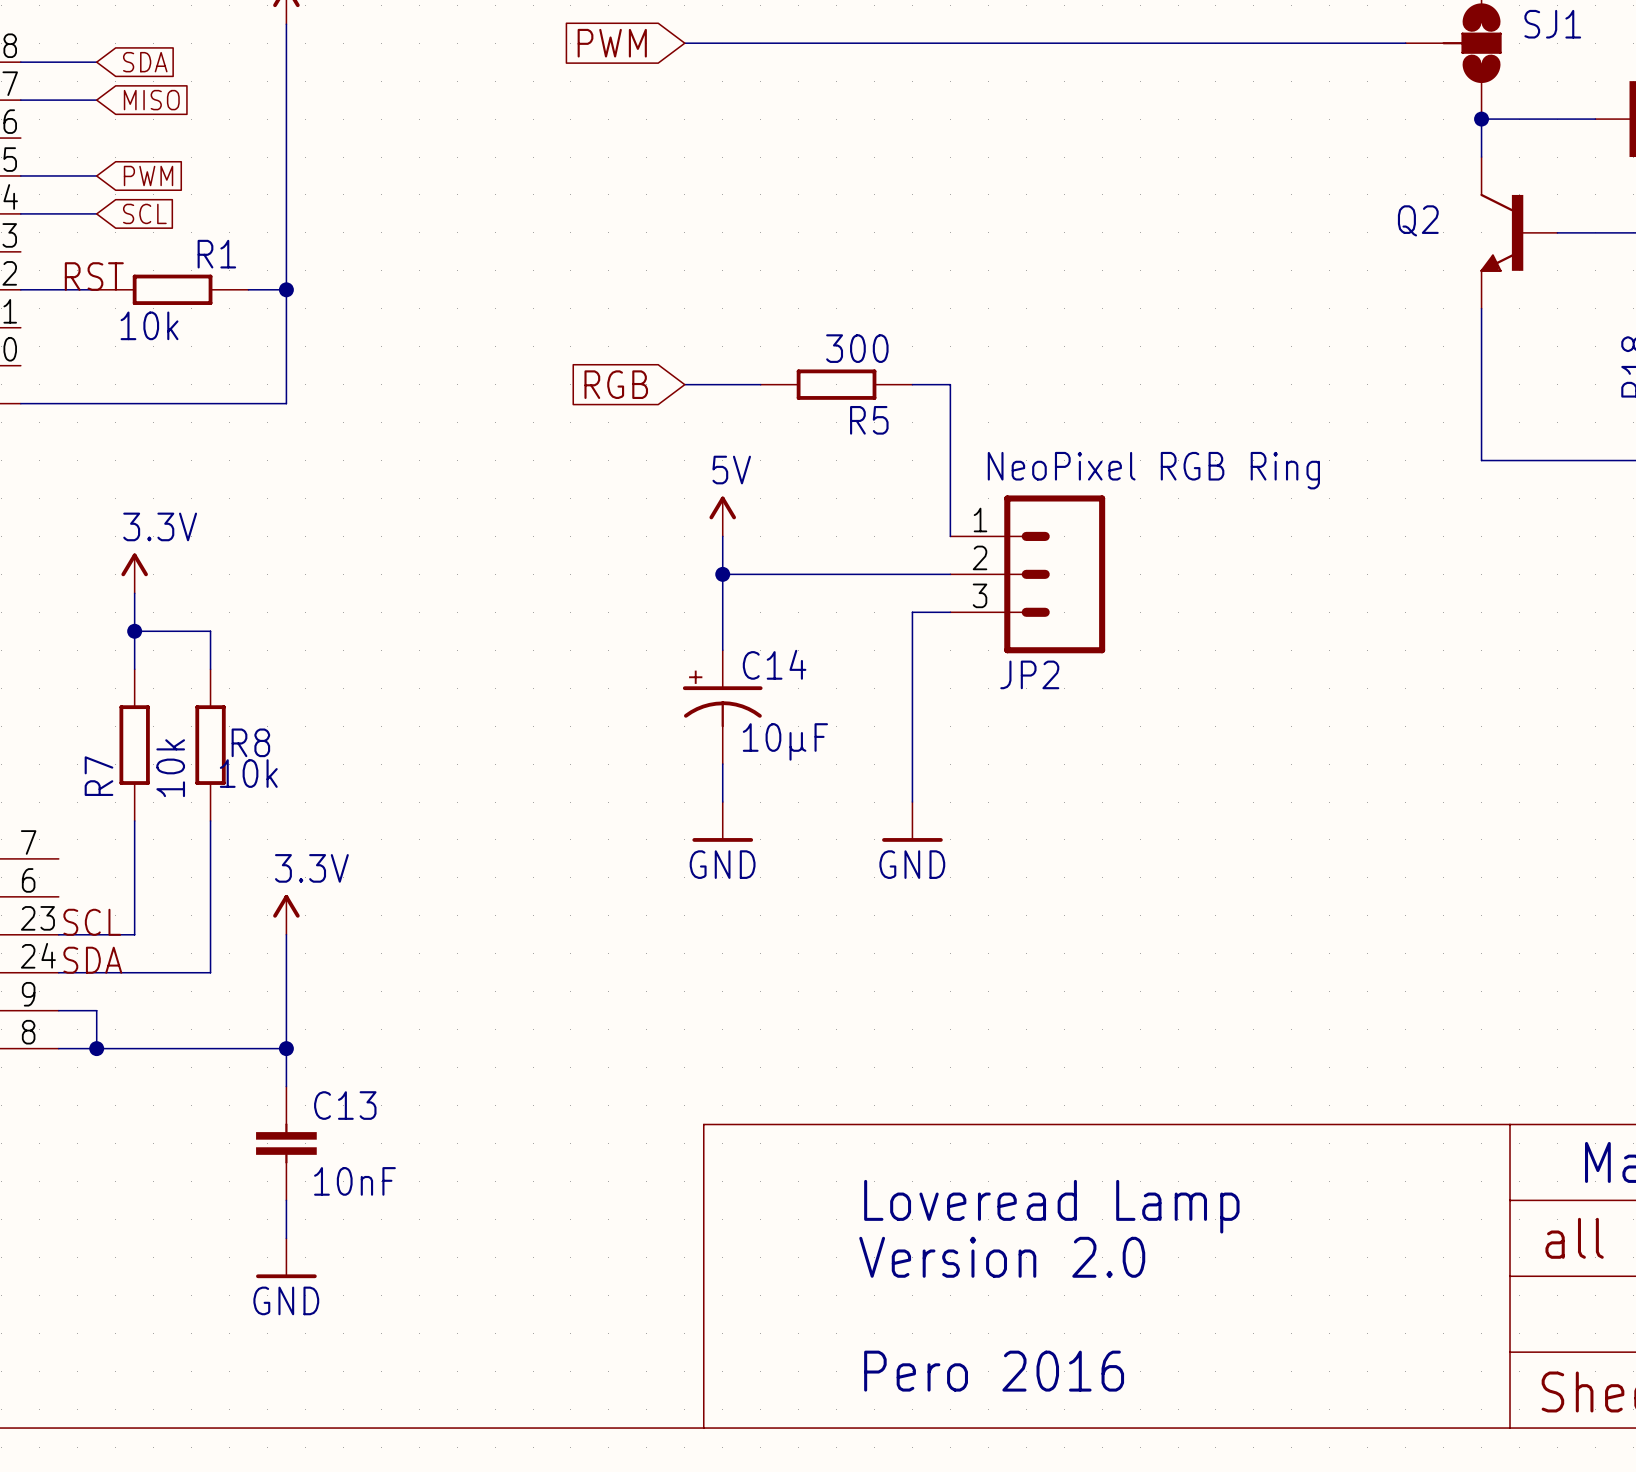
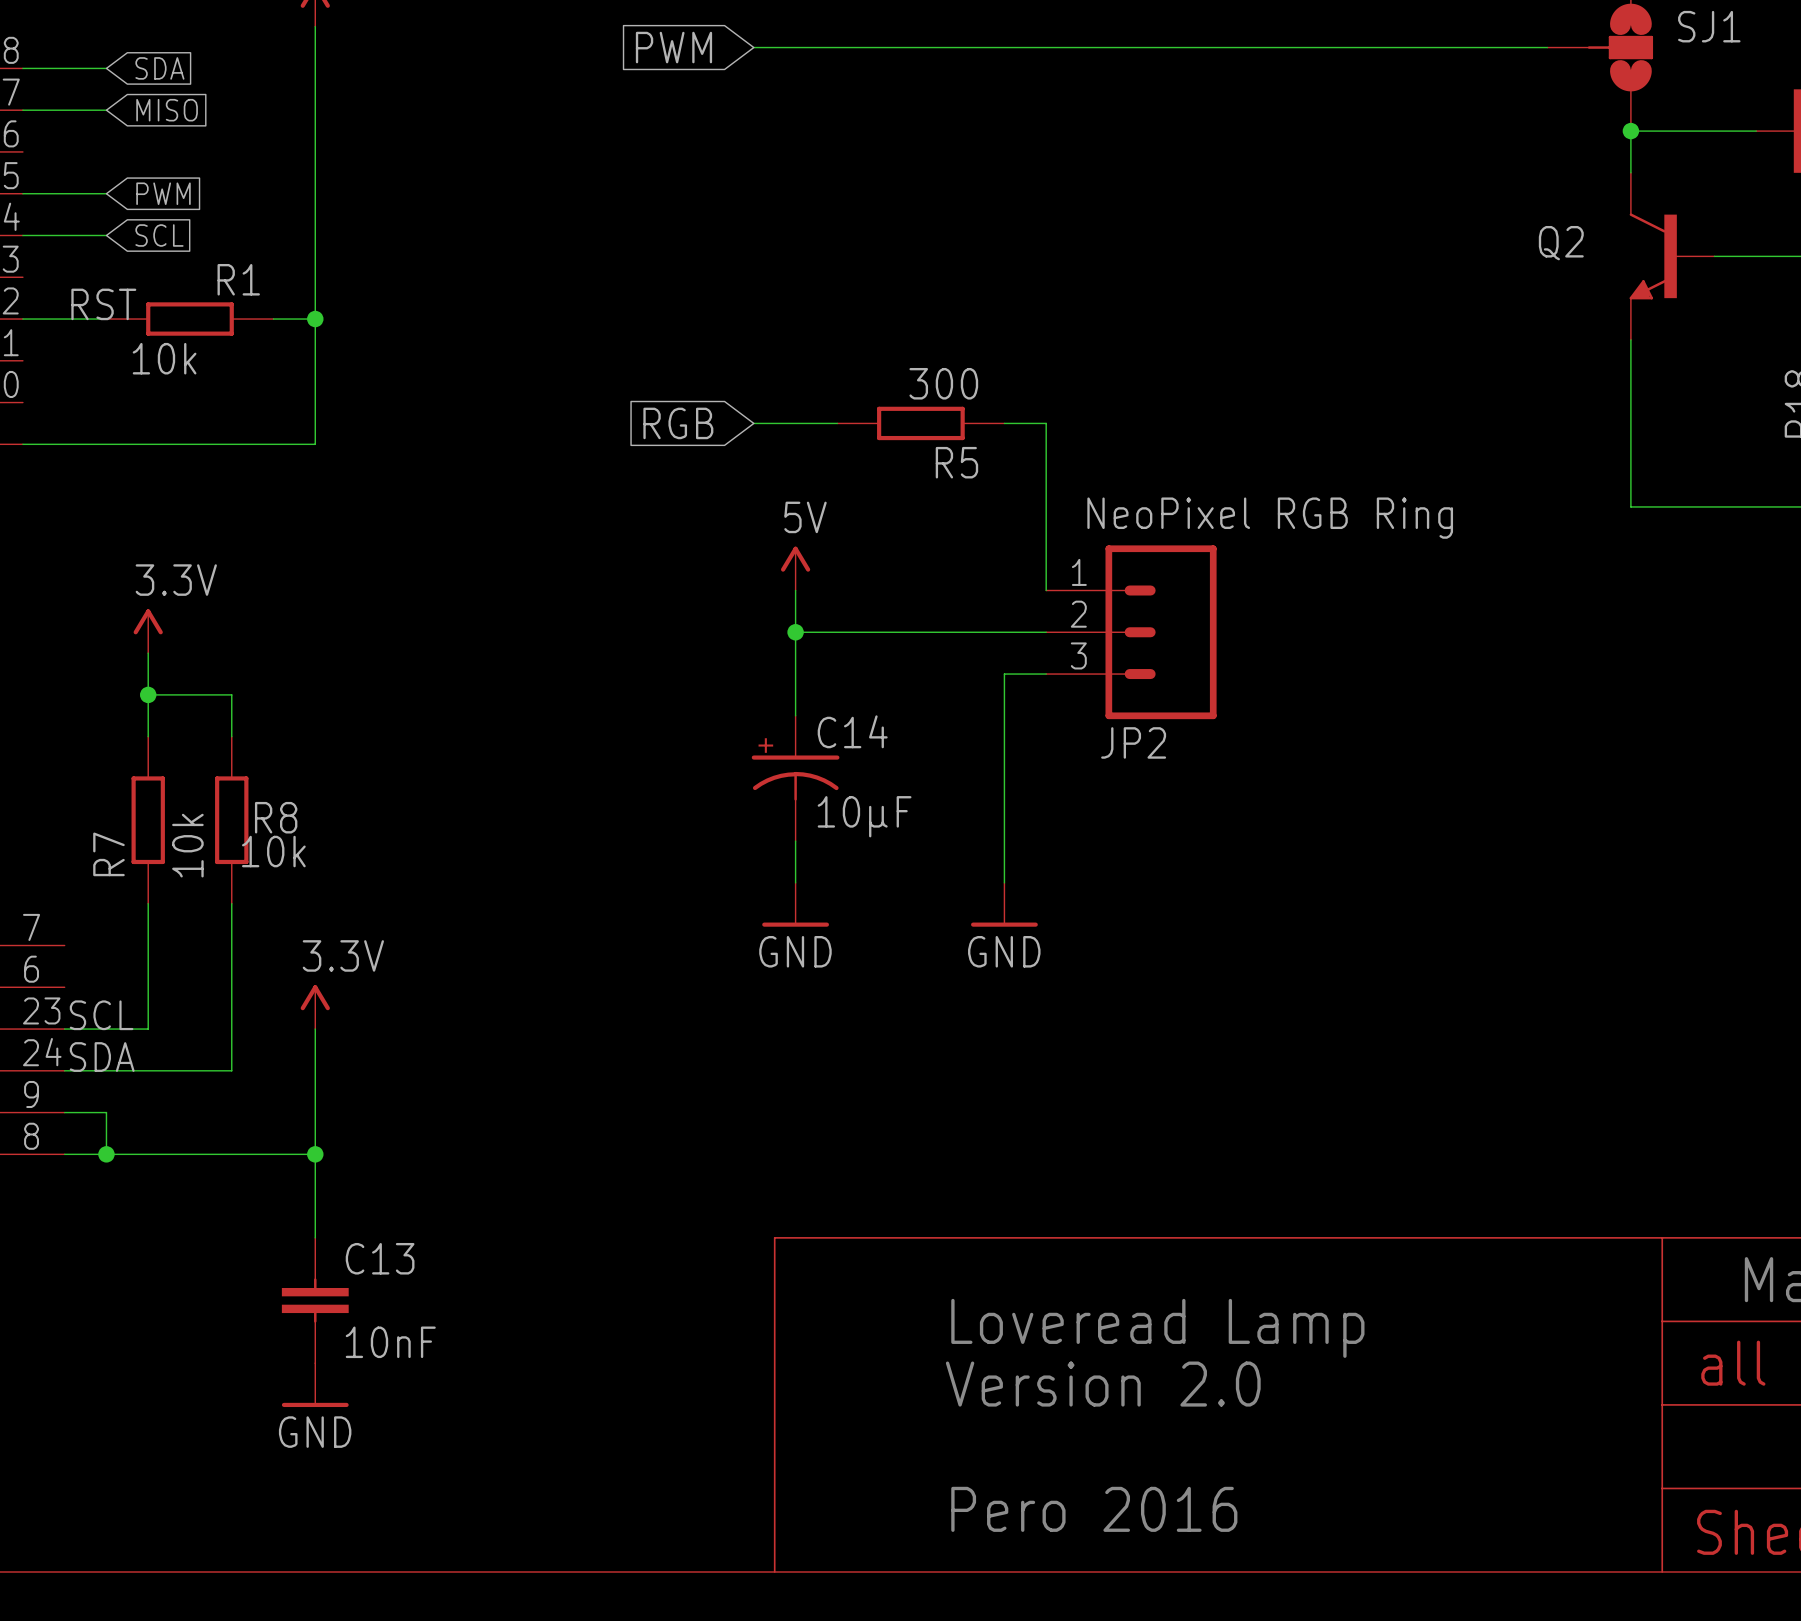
C13 position: (286, 1143) -> (315, 1300)

